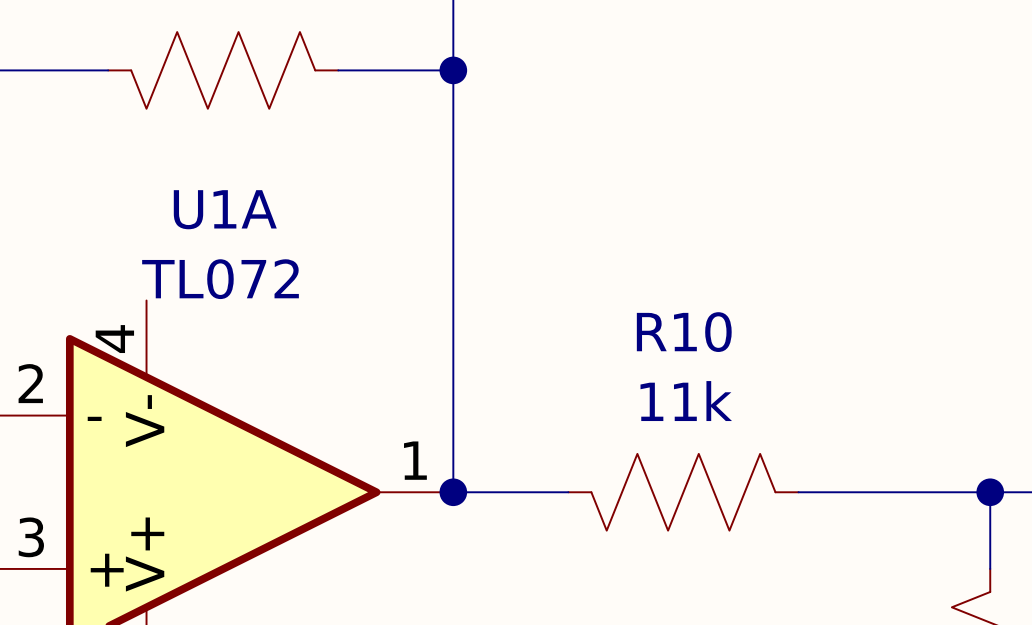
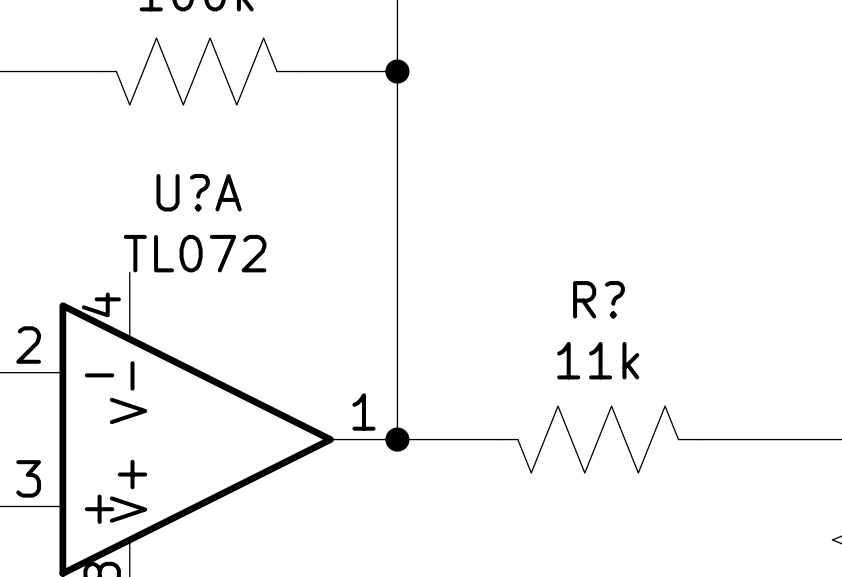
U1A name: U1A (225, 209) -> U?A (199, 192)
R10 name: R10 (684, 332) -> R? (598, 299)

